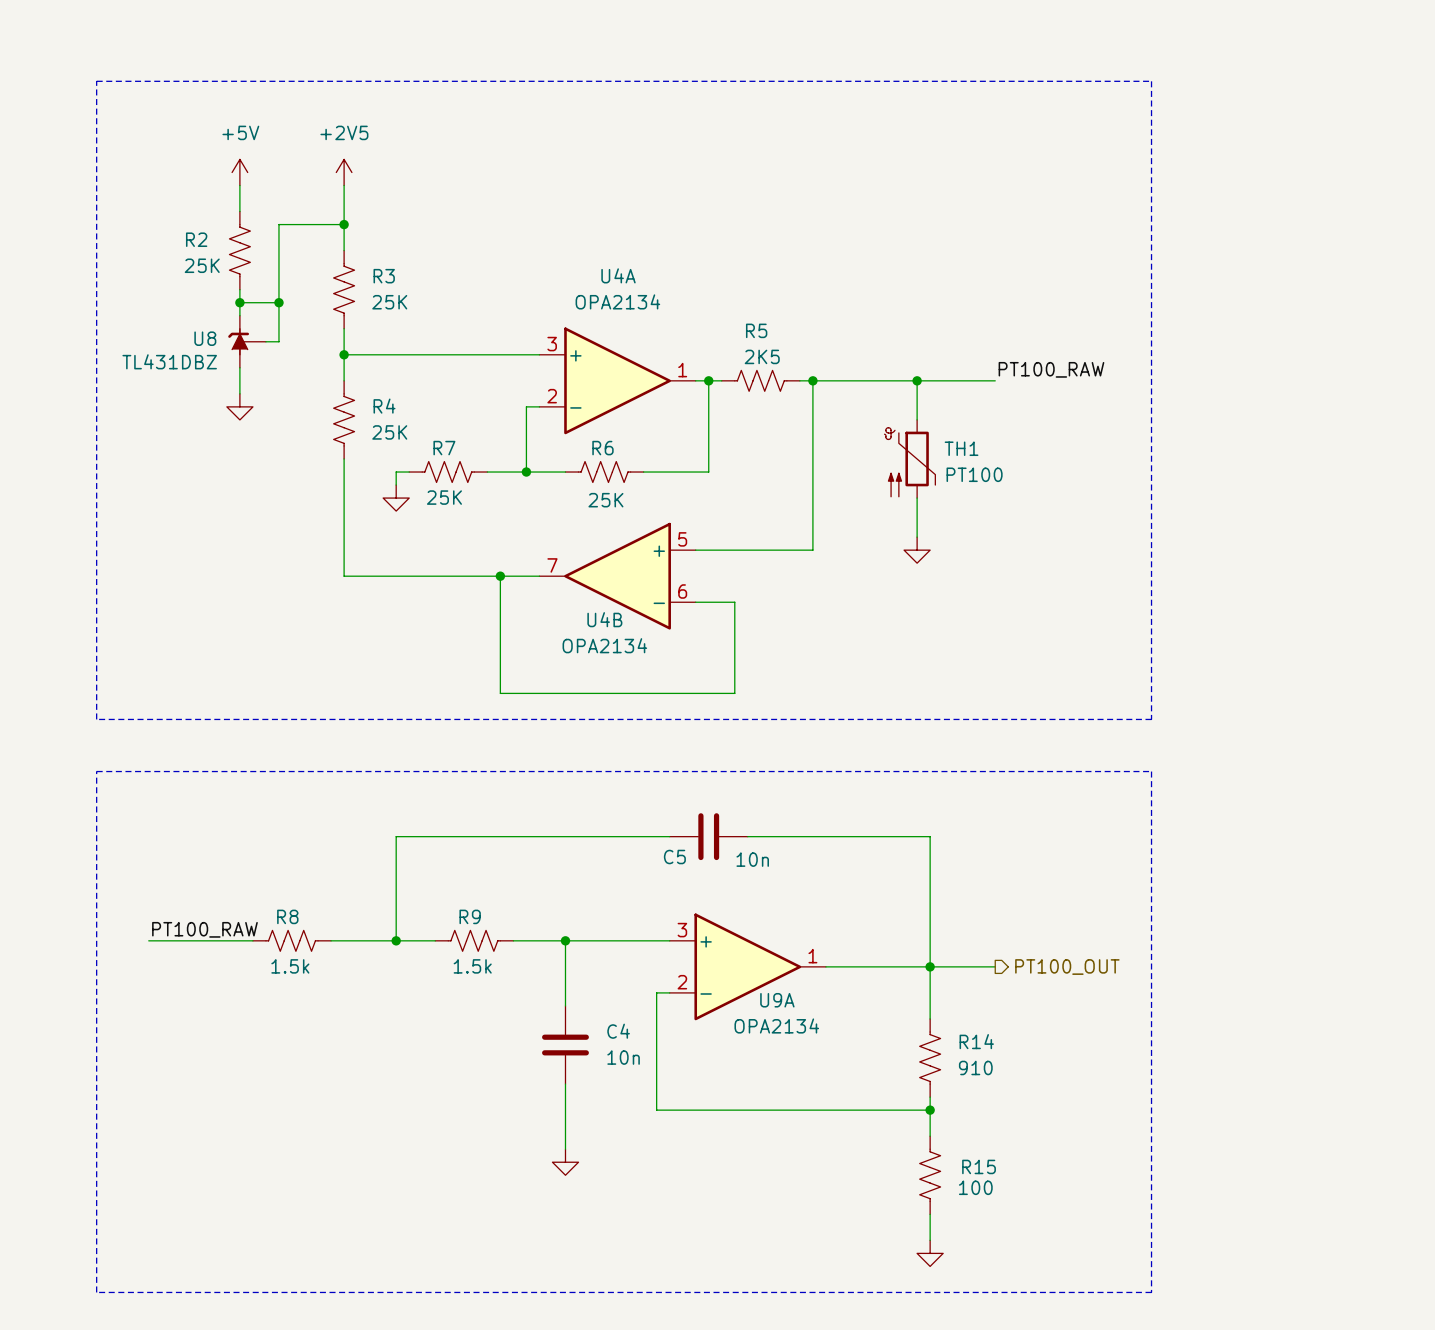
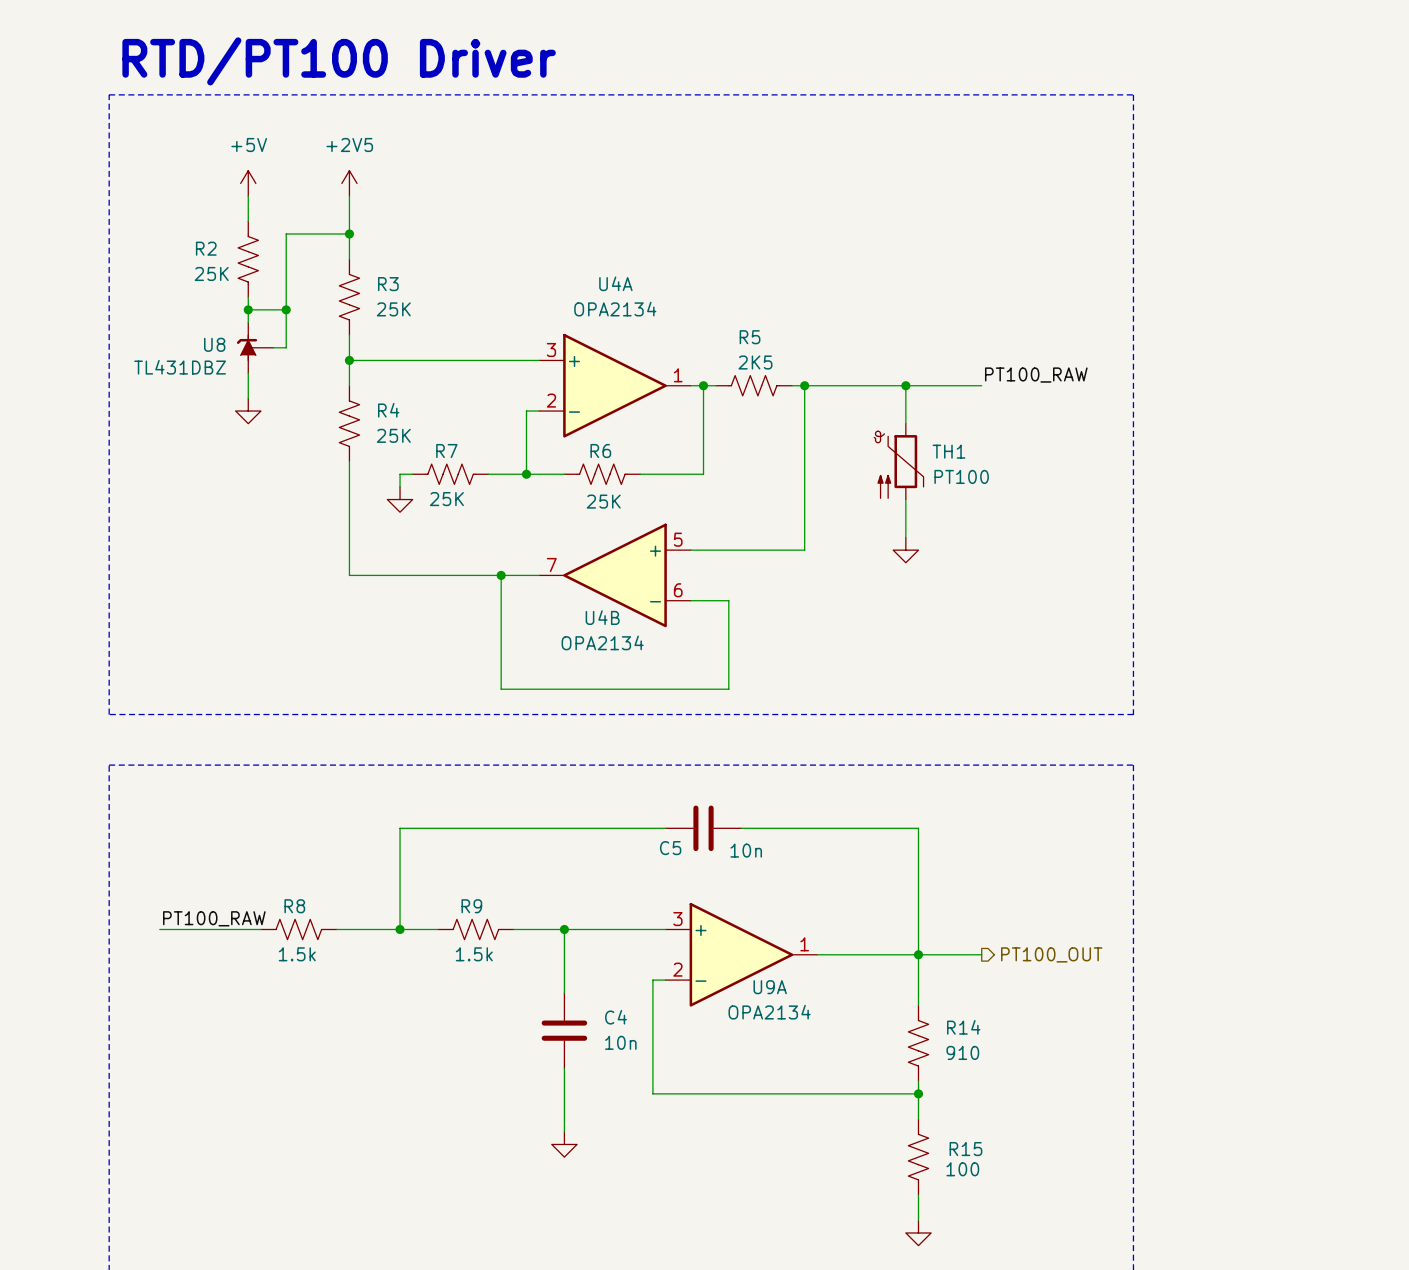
text: none -> RTD/PT100 Driver (339, 61)

